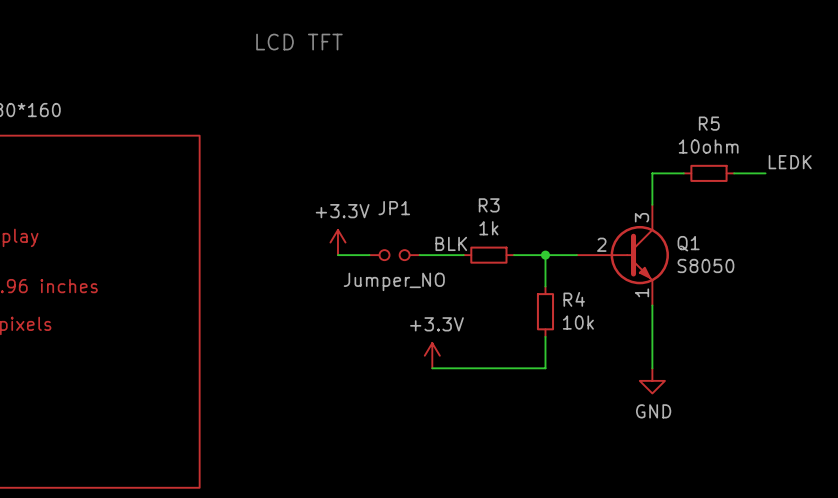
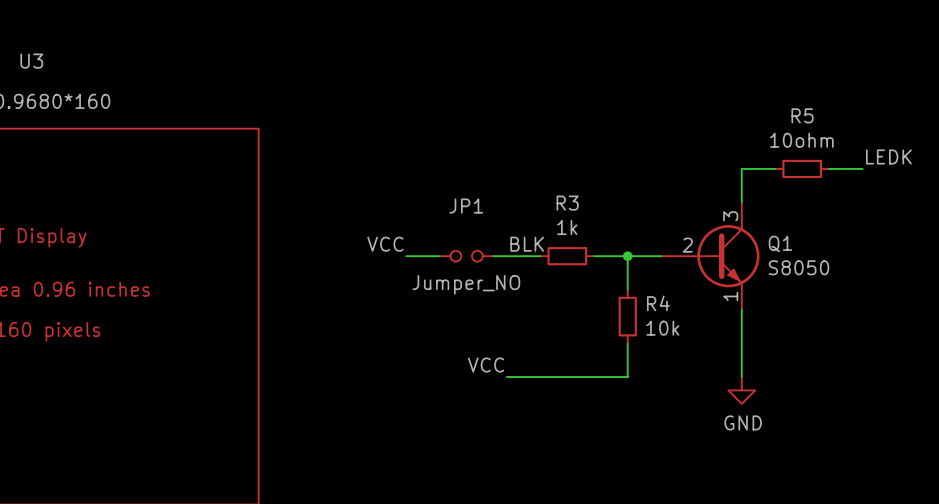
text: LCD TFT (299, 42) -> none
power symbol: +3.3V (337, 242) -> none
label: none -> VCC (385, 244)
power symbol: +3.3V (432, 355) -> none
label: none -> VCC (486, 365)

